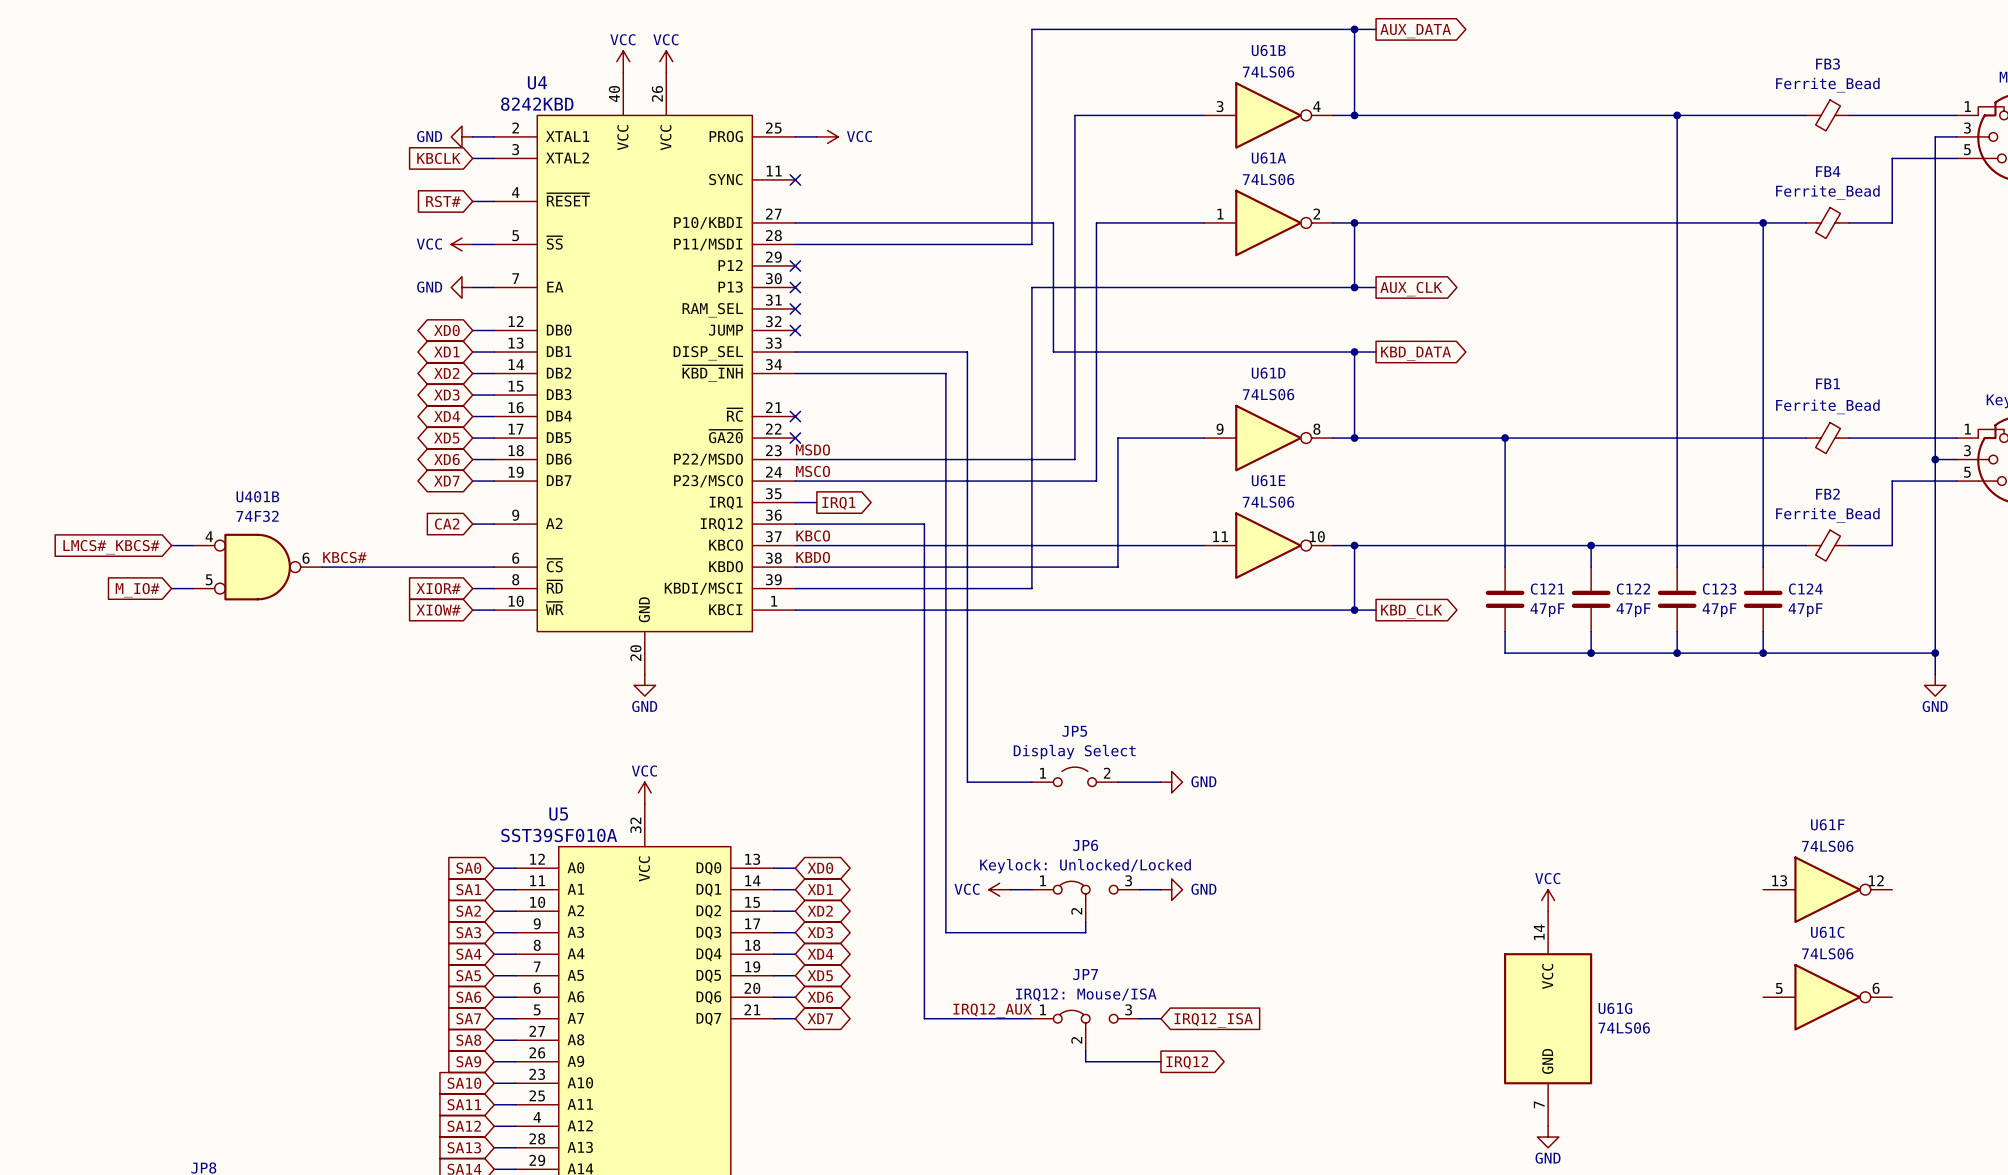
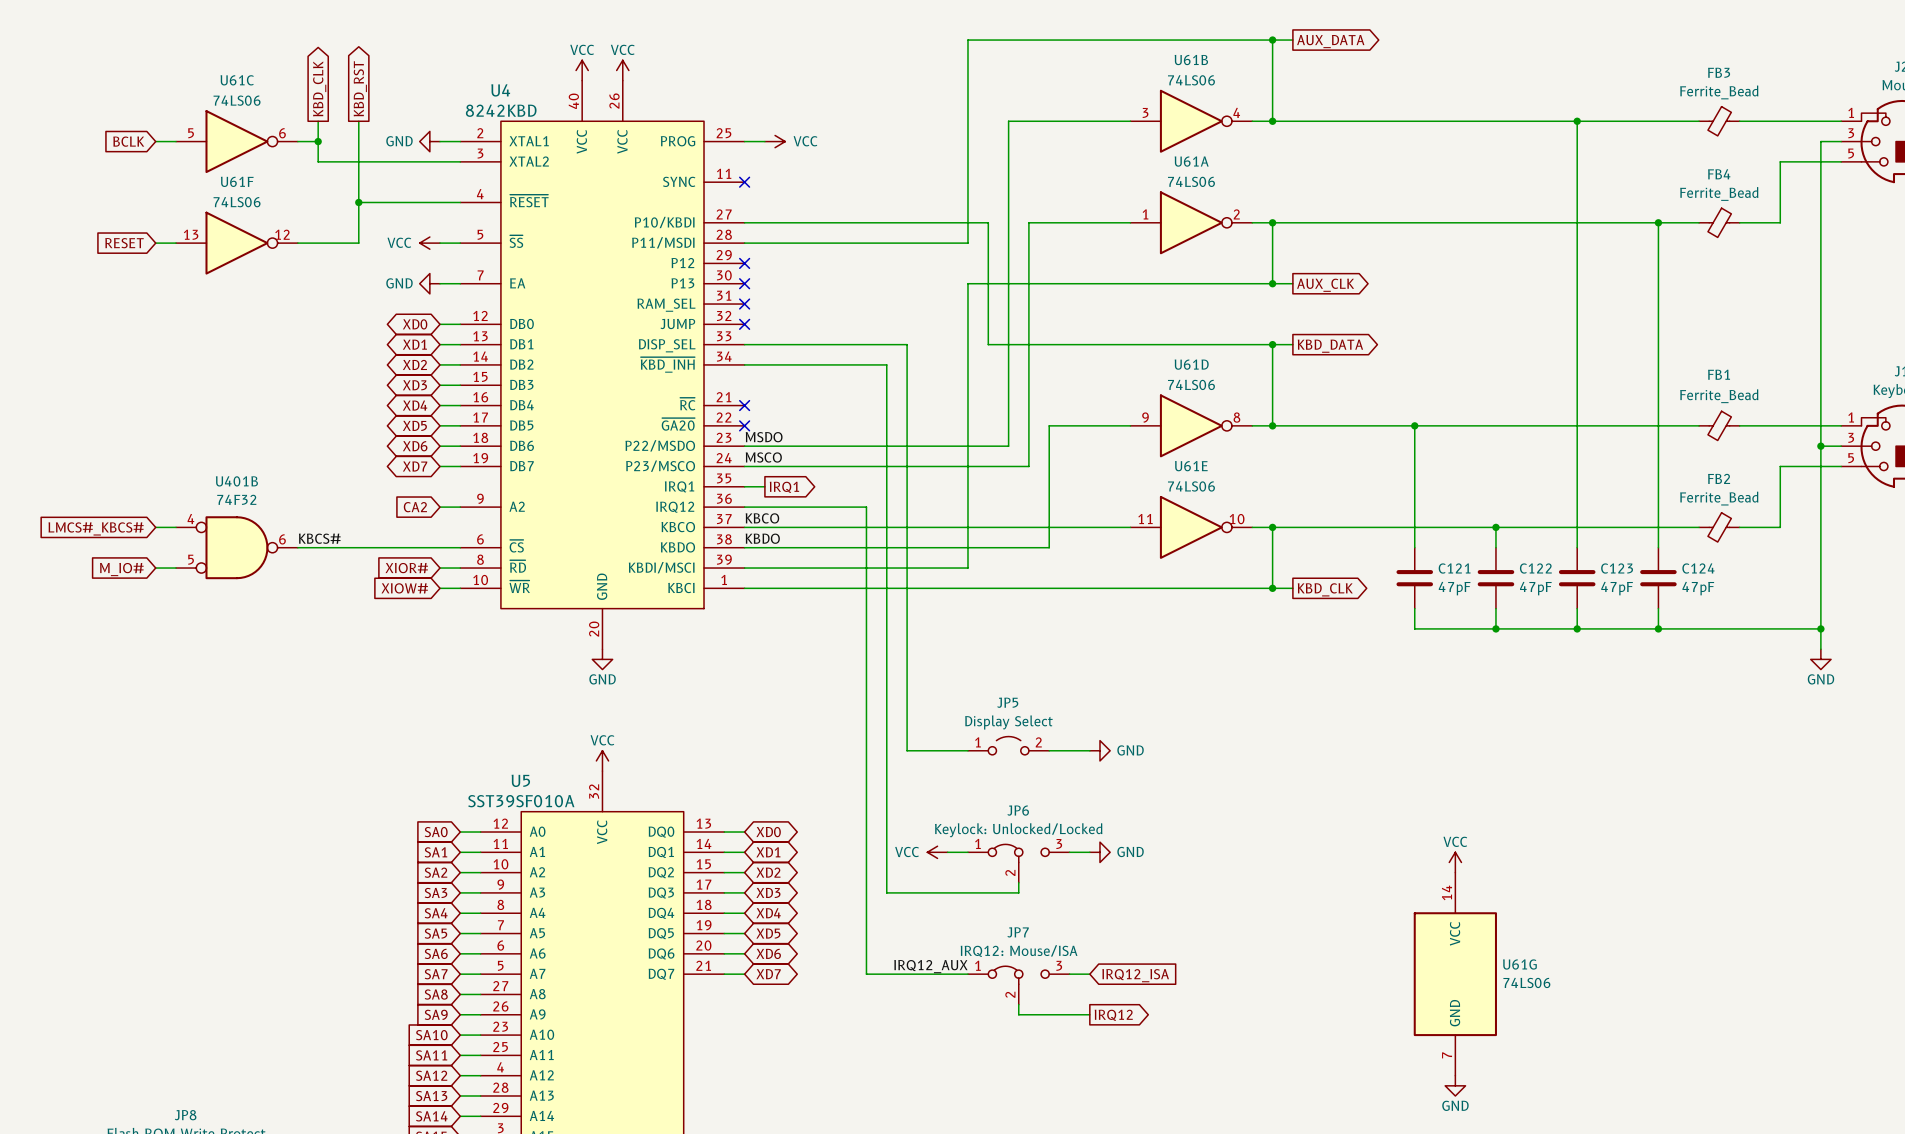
global label: none -> KBD_CLK (319, 88)
global label: none -> KBD_RST (360, 88)
wire: none -> (318, 121) (318, 161) (440, 161)
wire: none -> (358, 121) (358, 243) (297, 243)
global label: none -> BCLK (128, 141)
wire: none -> (155, 141) (176, 141)
wire: none -> (297, 141) (318, 141)
junction: none -> (318, 141)
global label: KBCLK (438, 158) -> none
wire: none -> (358, 202) (440, 202)
junction: none -> (358, 202)
global label: RST# (443, 201) -> none
global label: none -> RESET (124, 243)
wire: none -> (155, 243) (176, 243)
U61F position: (1827, 889) -> (236, 243)
U61C position: (1827, 997) -> (236, 141)

